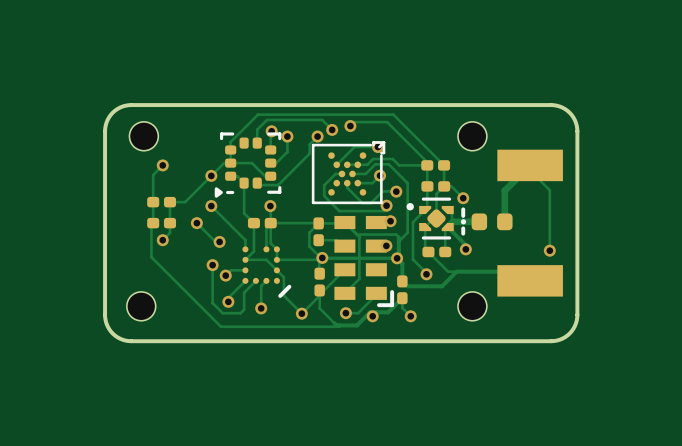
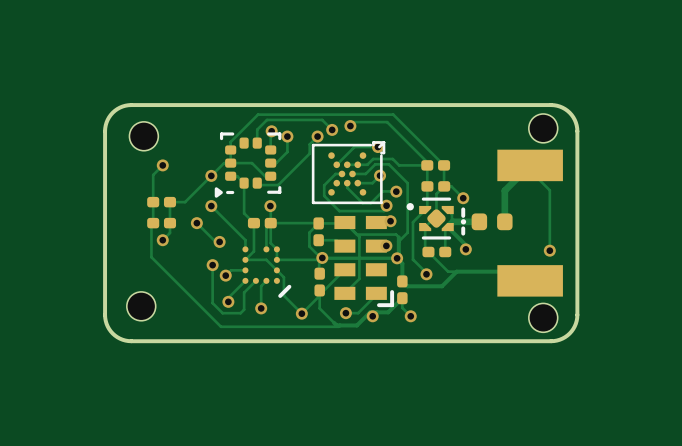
part position: (472, 136) -> (543, 128)
part position: (472, 306) -> (543, 317)

